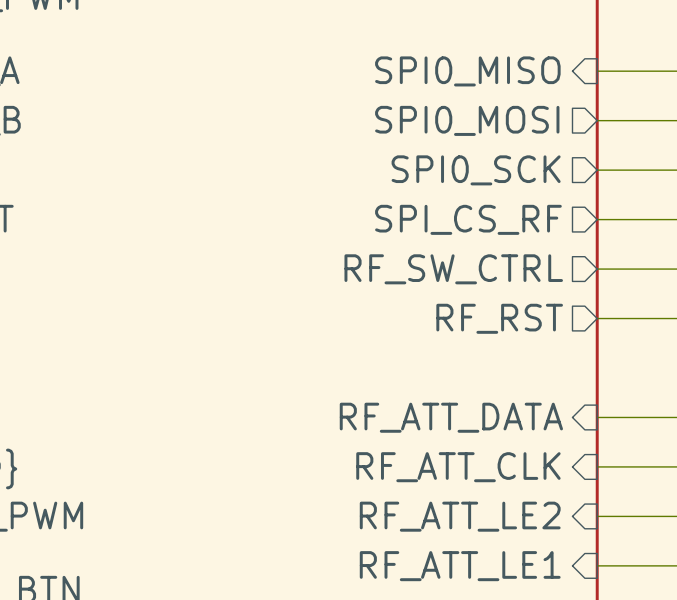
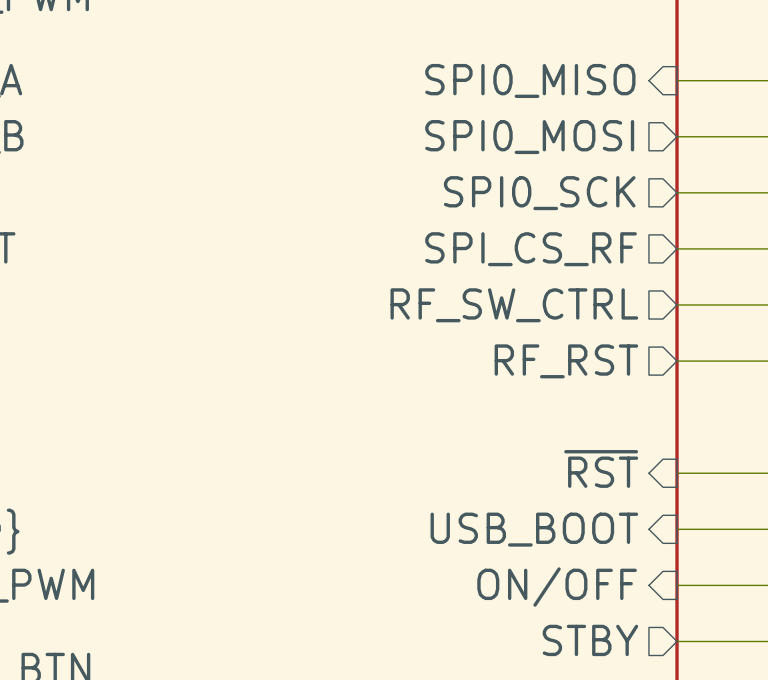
sheet pin: RF_ATT_DATA (451, 417) -> ~{RST} (601, 468)
sheet pin: RF_ATT_CLK (458, 467) -> USB_BOOT (534, 529)
sheet pin: RF_ATT_LE2 (460, 516) -> ON/OFF (557, 587)
sheet pin shape: input (460, 566) -> output (590, 640)
sheet pin: RF_ATT_LE1 (460, 566) -> STBY (590, 640)

